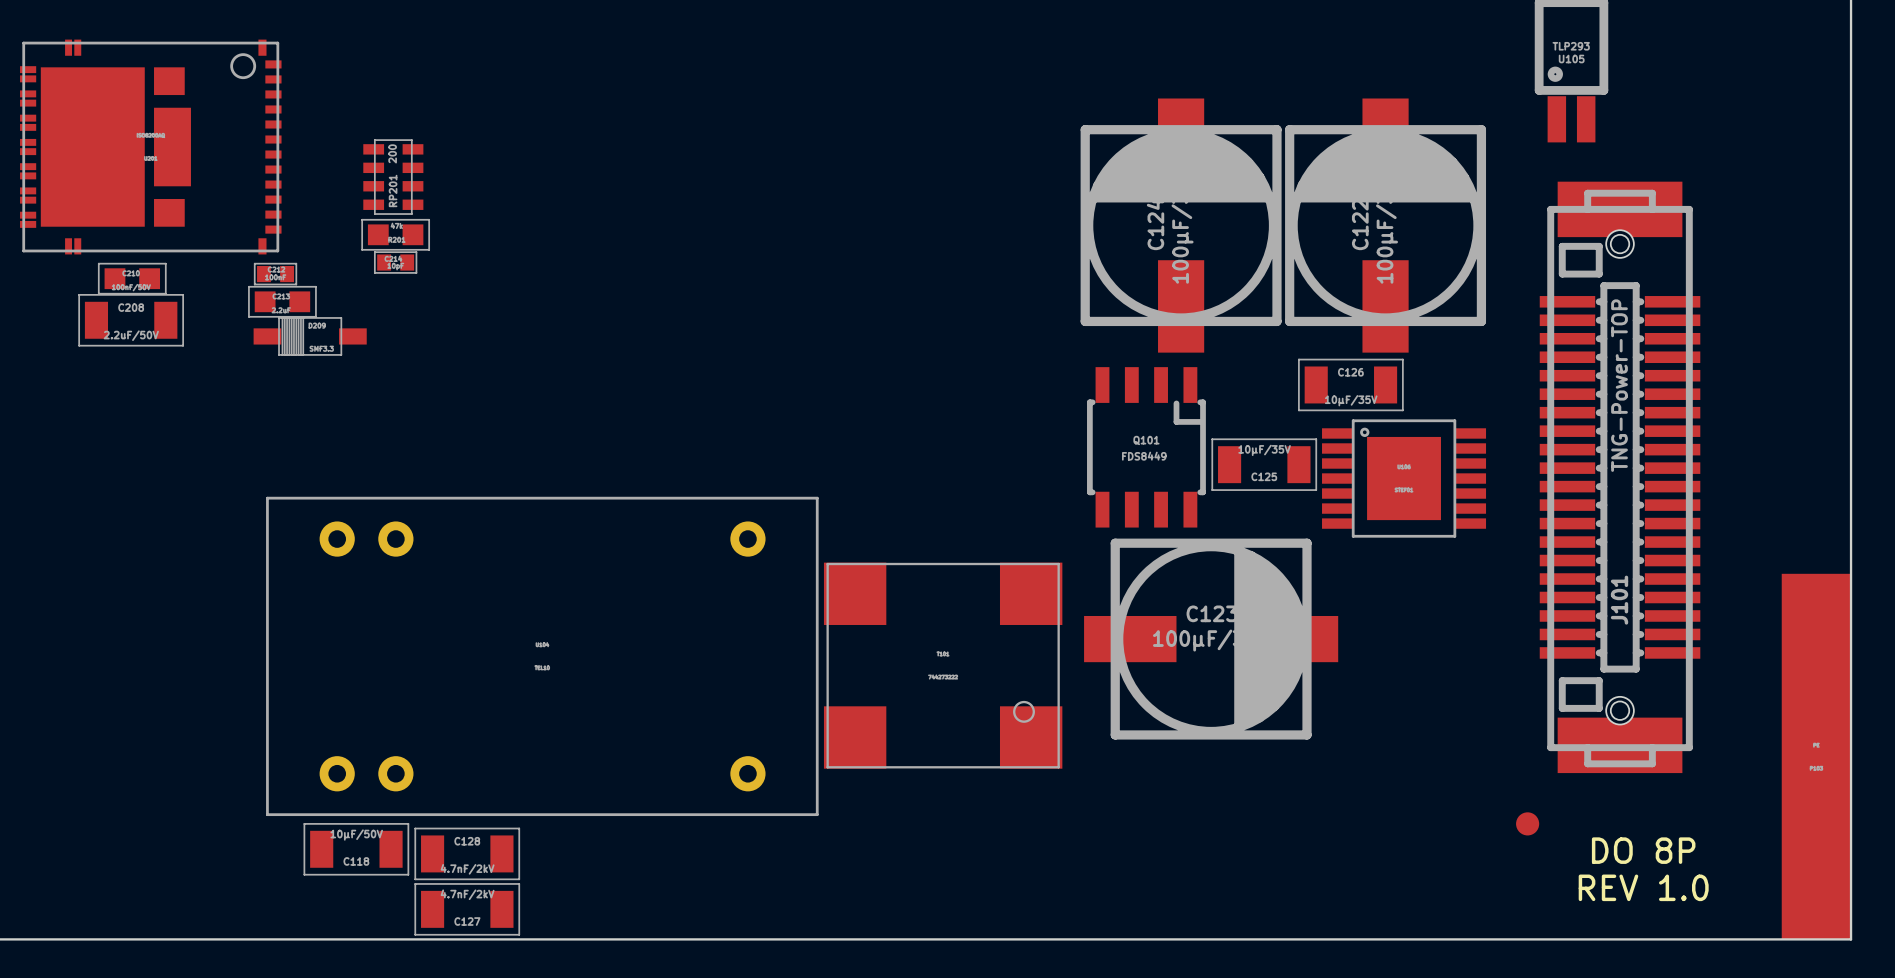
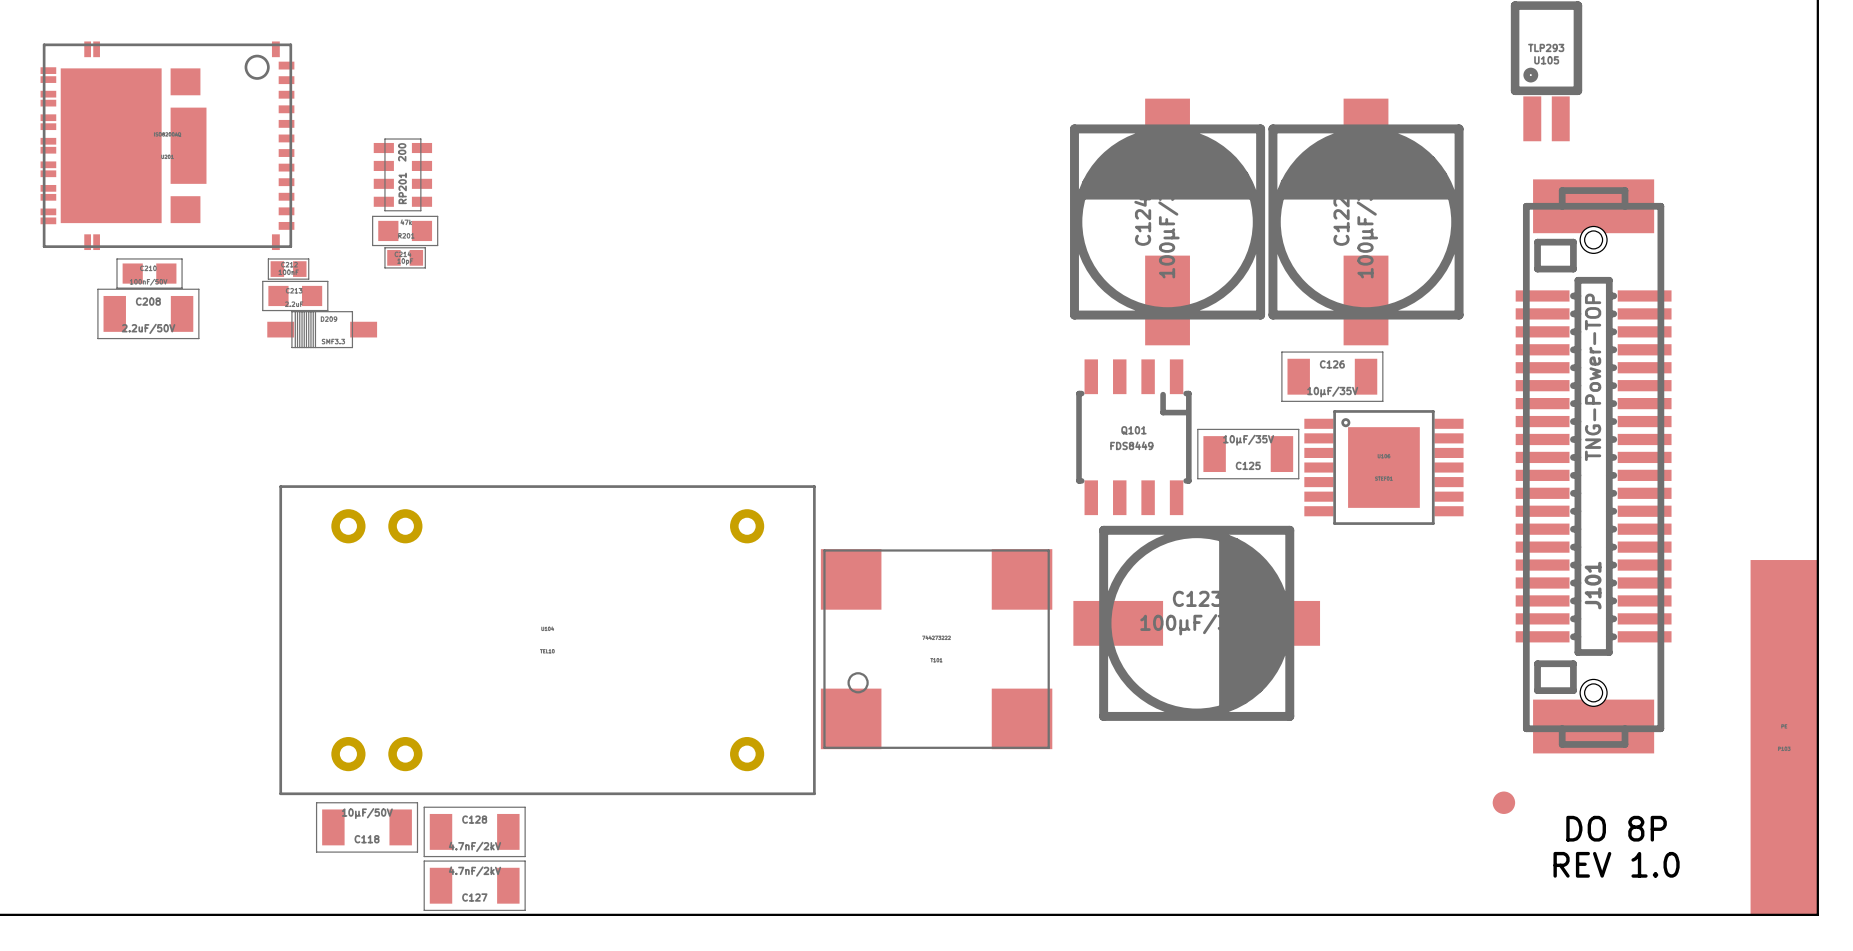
part footprint: [823, 562, 1063, 769] -> [820, 549, 1053, 750]

